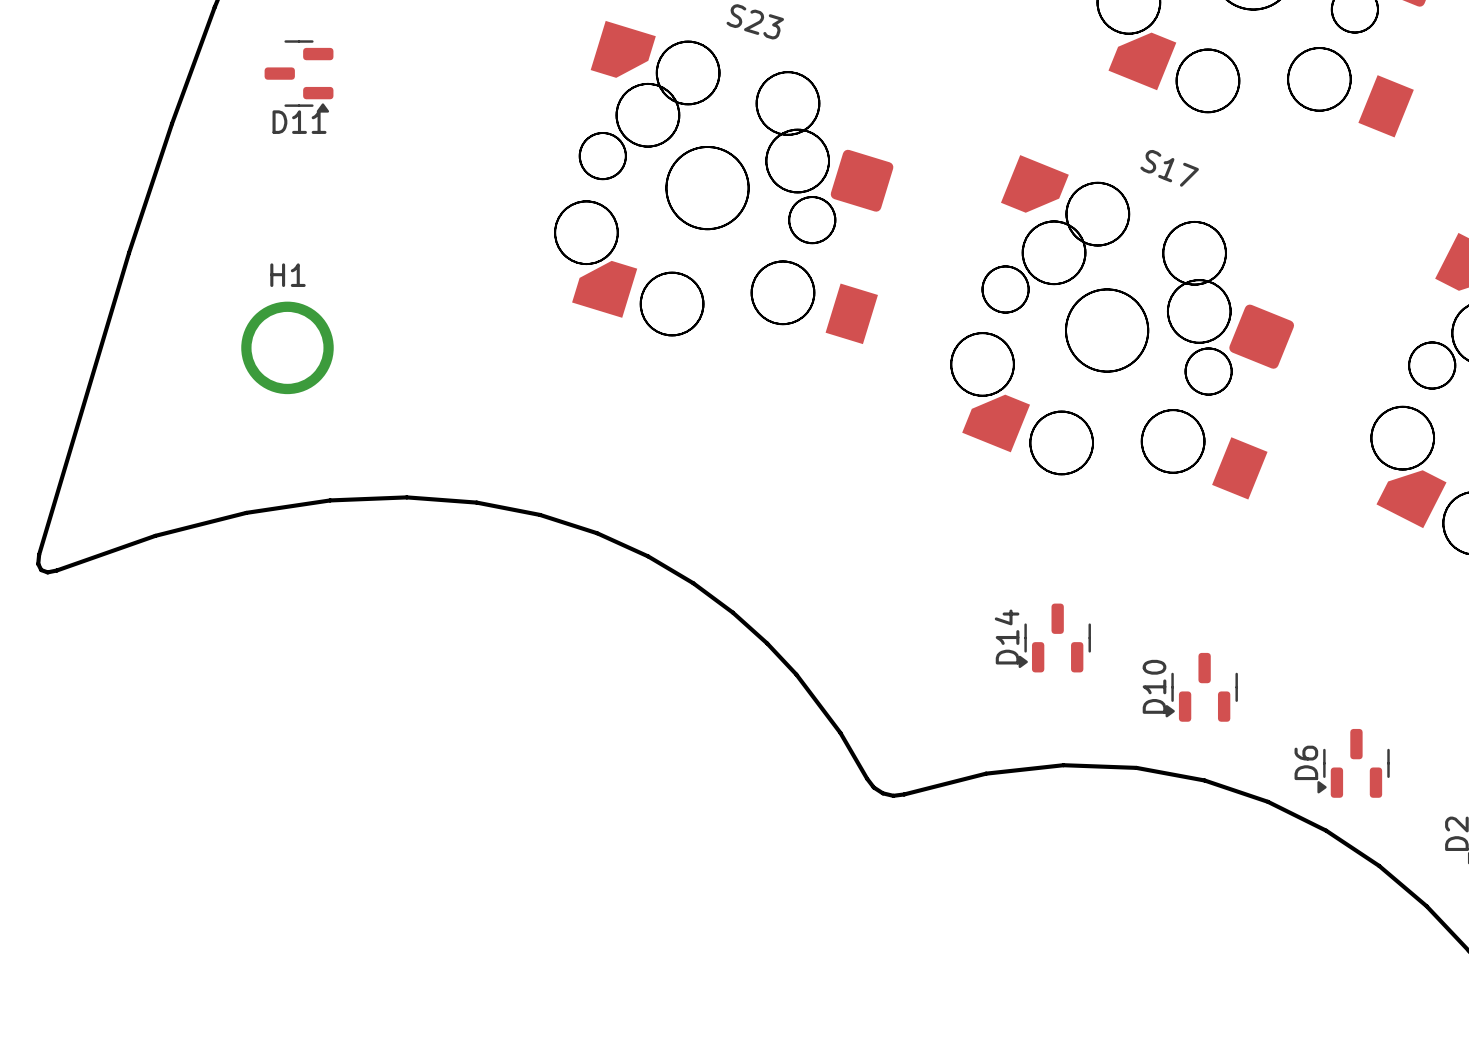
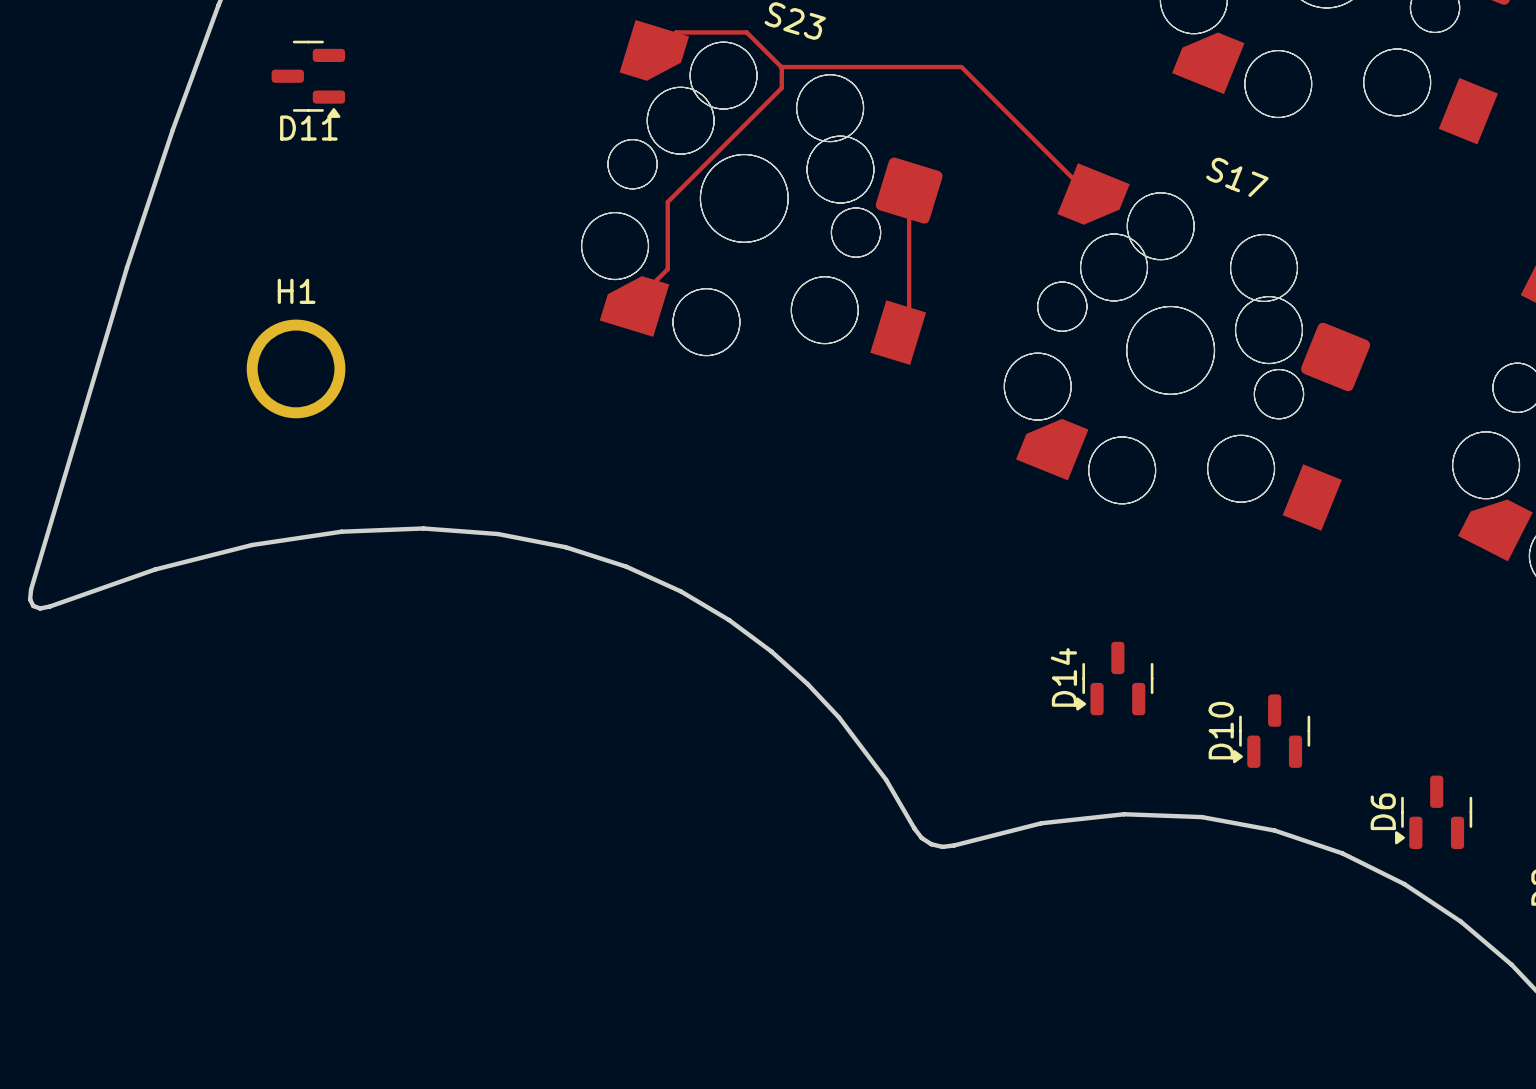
track: none -> (654, 54) (676, 32) (746, 32) (781, 67) (781, 88) (667, 202) (667, 269) (634, 302)
track: none -> (781, 67) (961, 67) (1093, 199)
track: none -> (909, 190) (909, 321) (898, 332)

